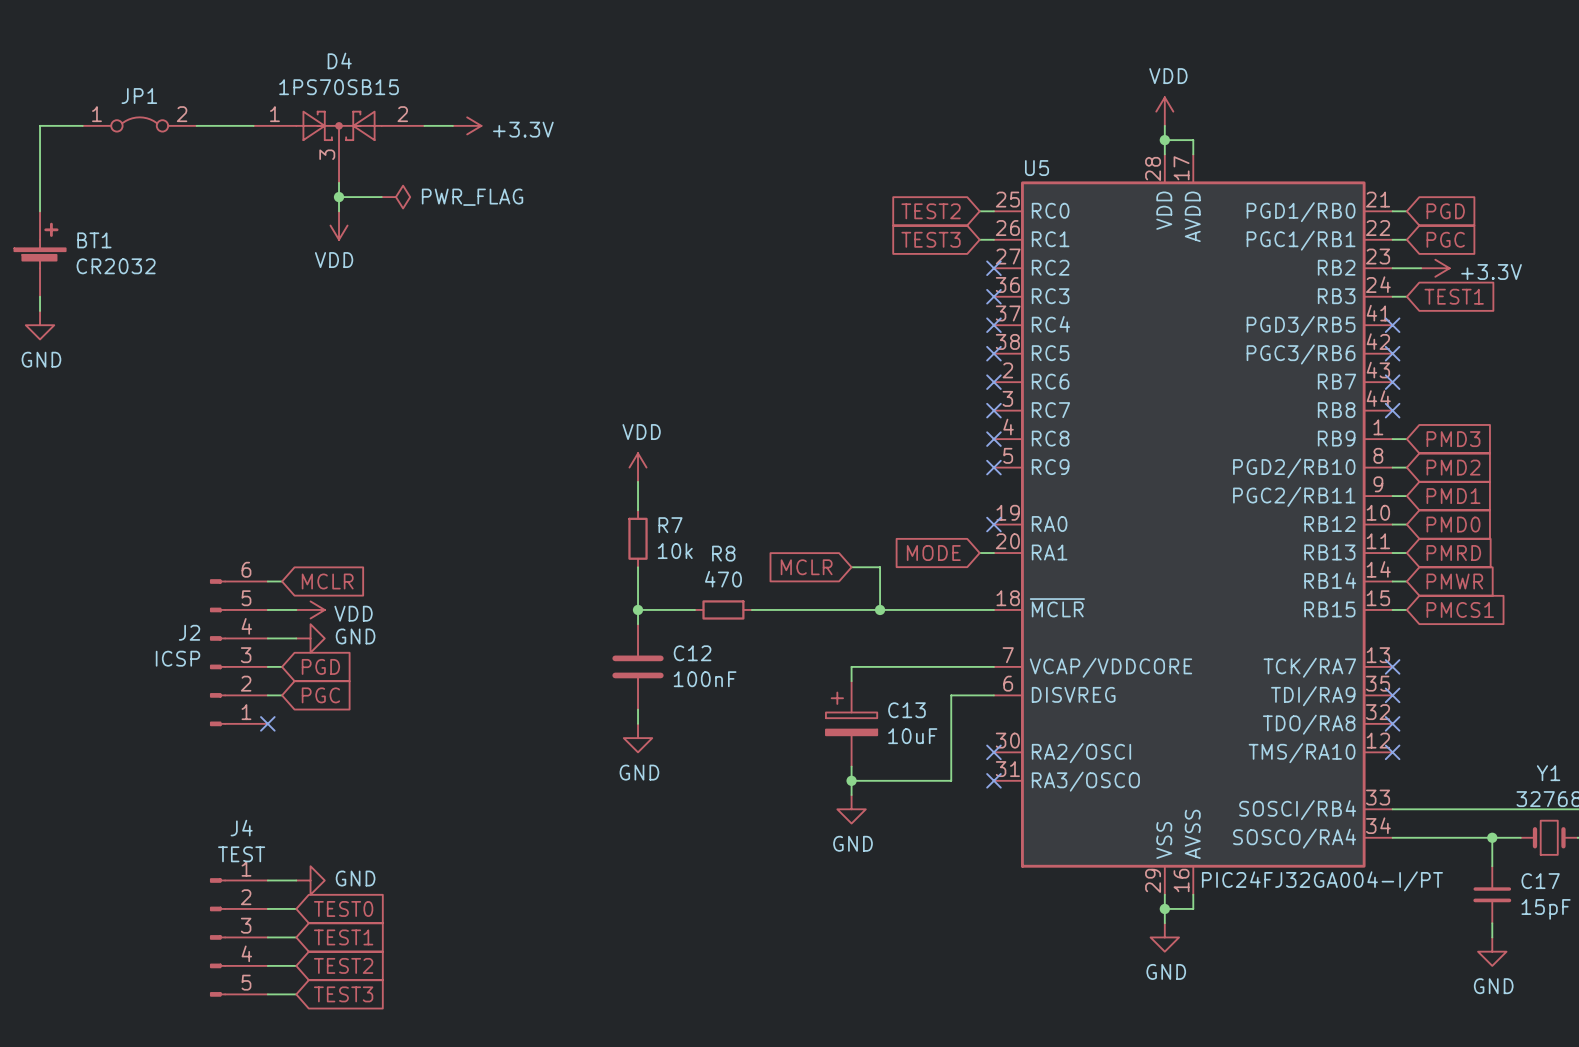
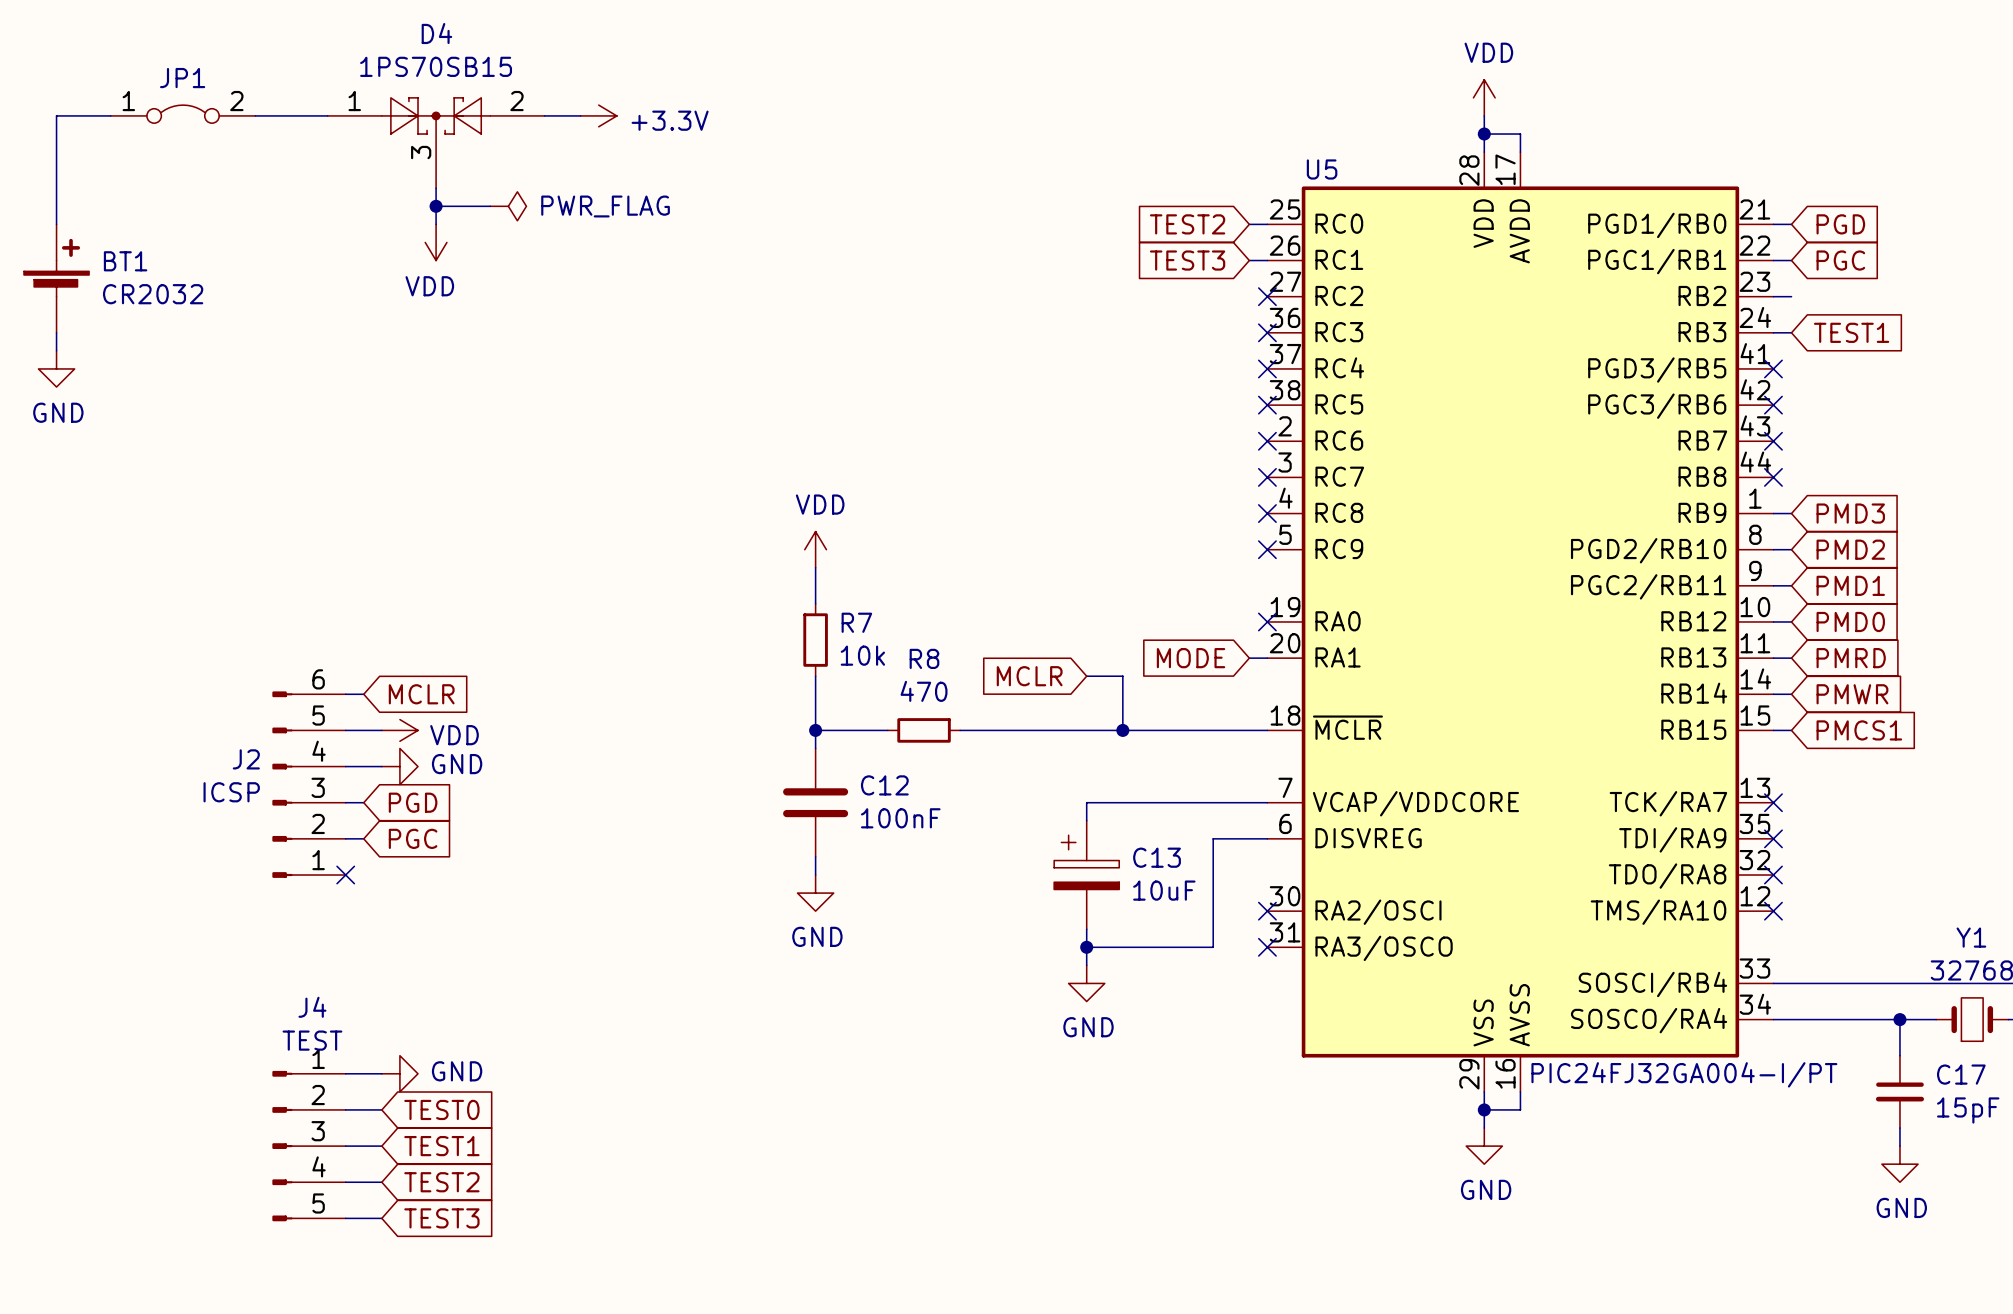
wire: (1406, 268) (1421, 268) -> none
power symbol: +3.3V (1435, 268) -> none

